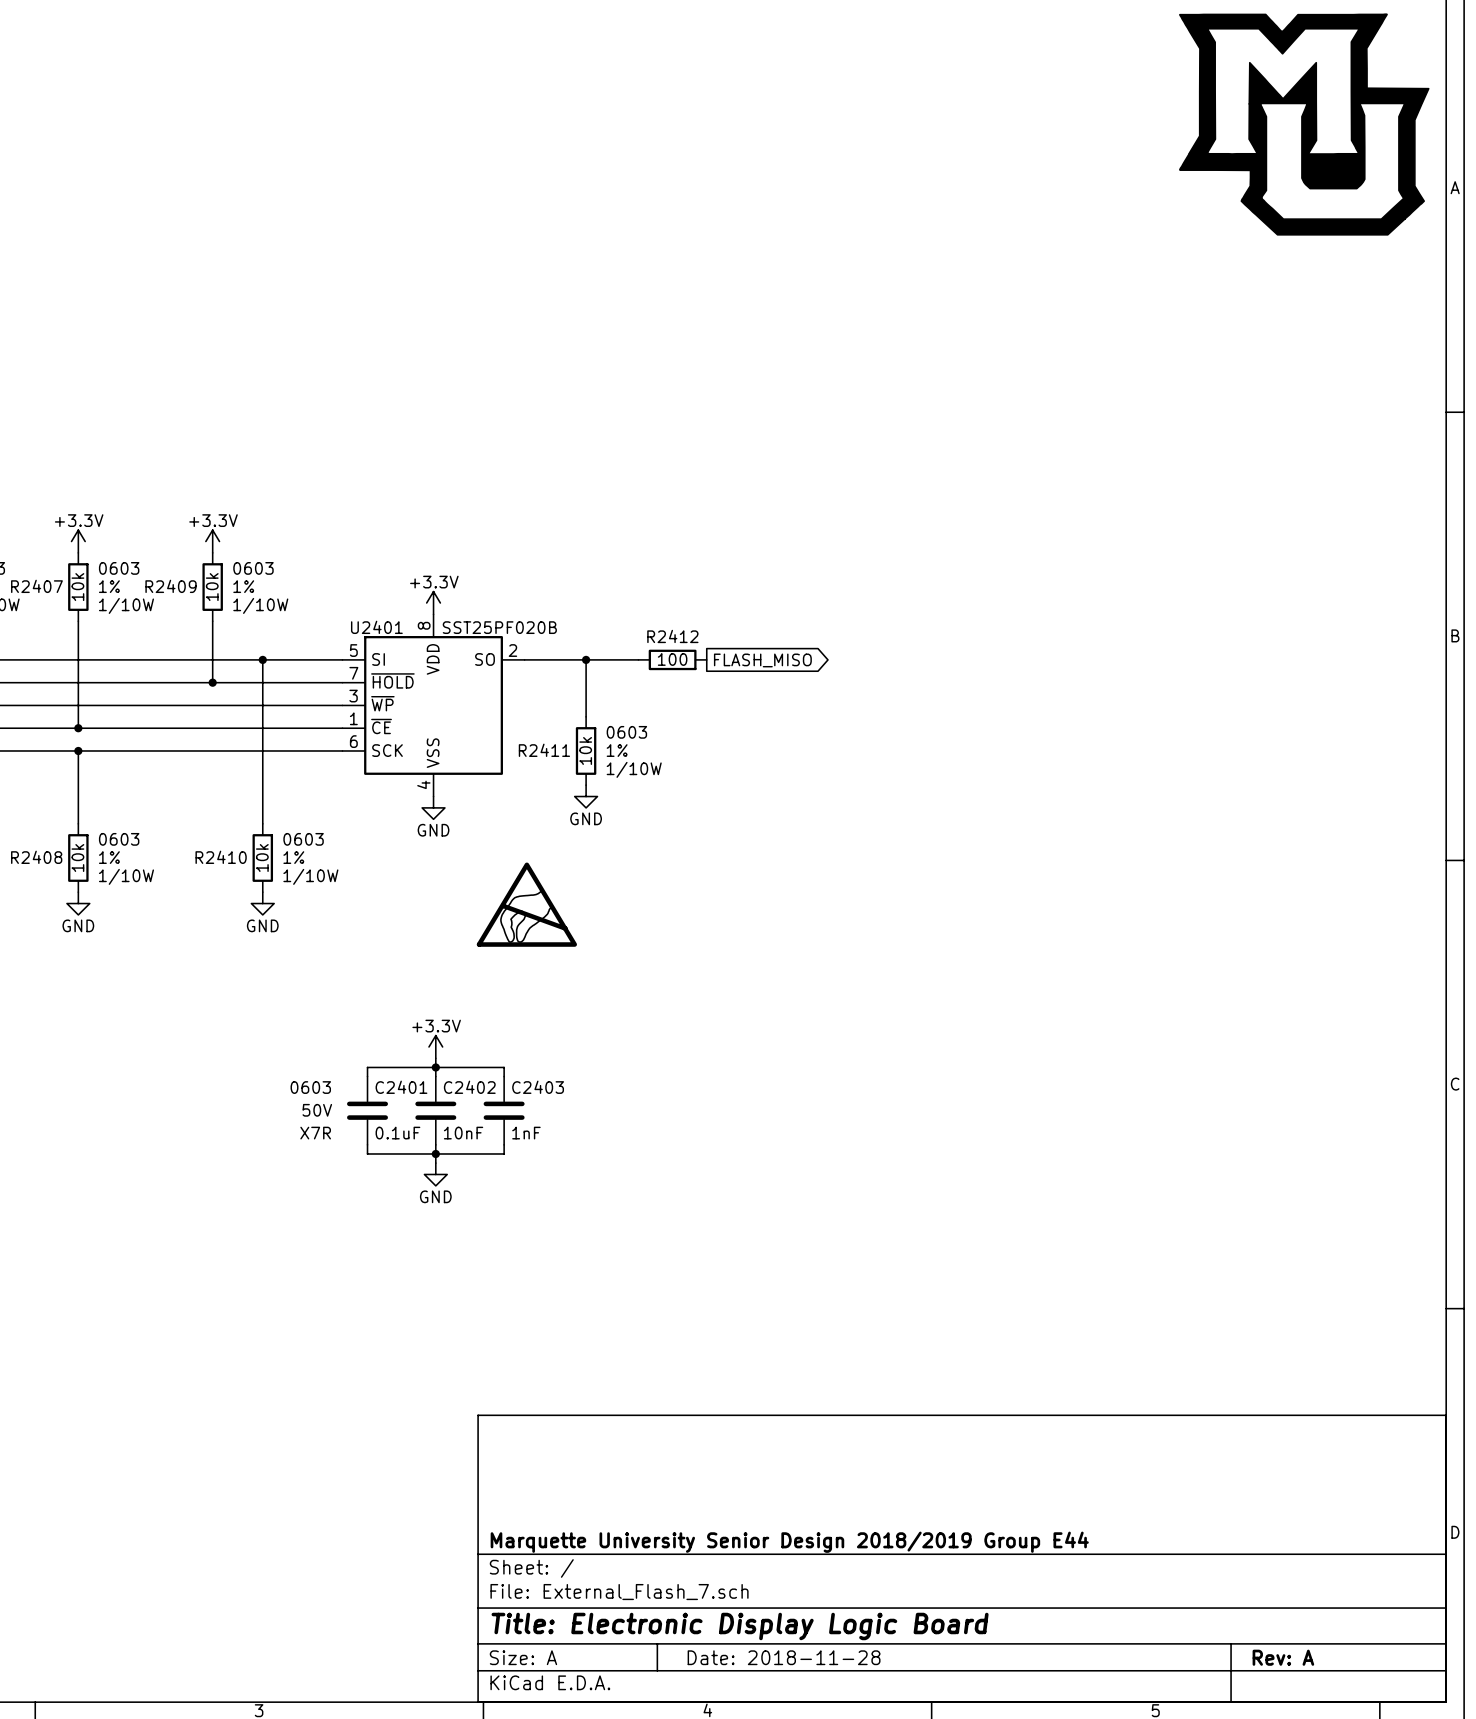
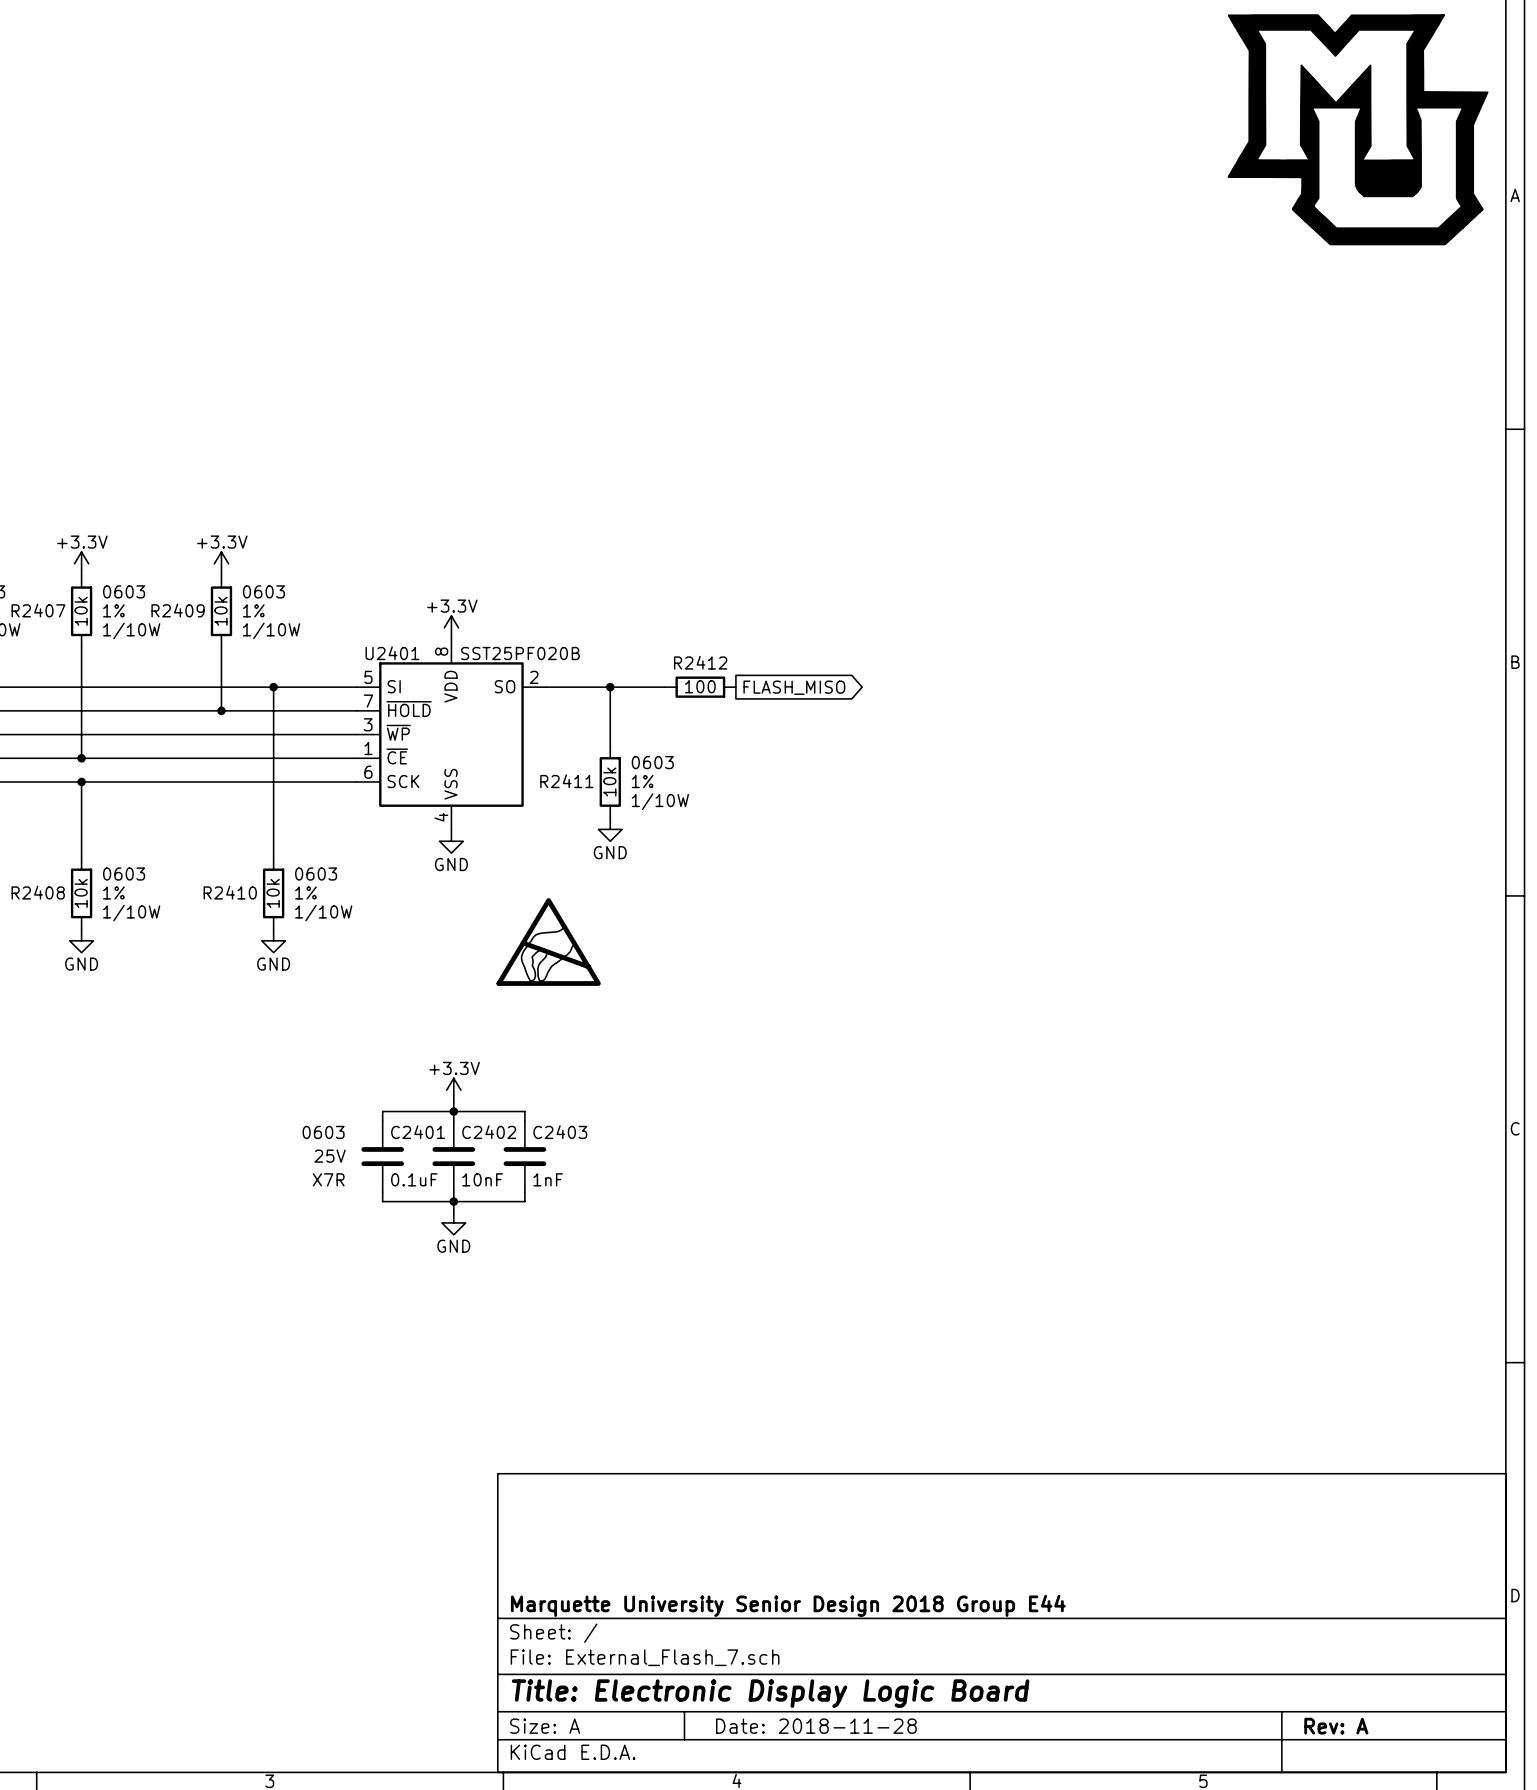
C2401 text: 50V (317, 1110) -> 25V (330, 1156)
title block: Marquette University Senior Design 2018/2019 Group E44 (789, 1542) -> Marquette University Senior Design 2018 Group E44 (788, 1605)

